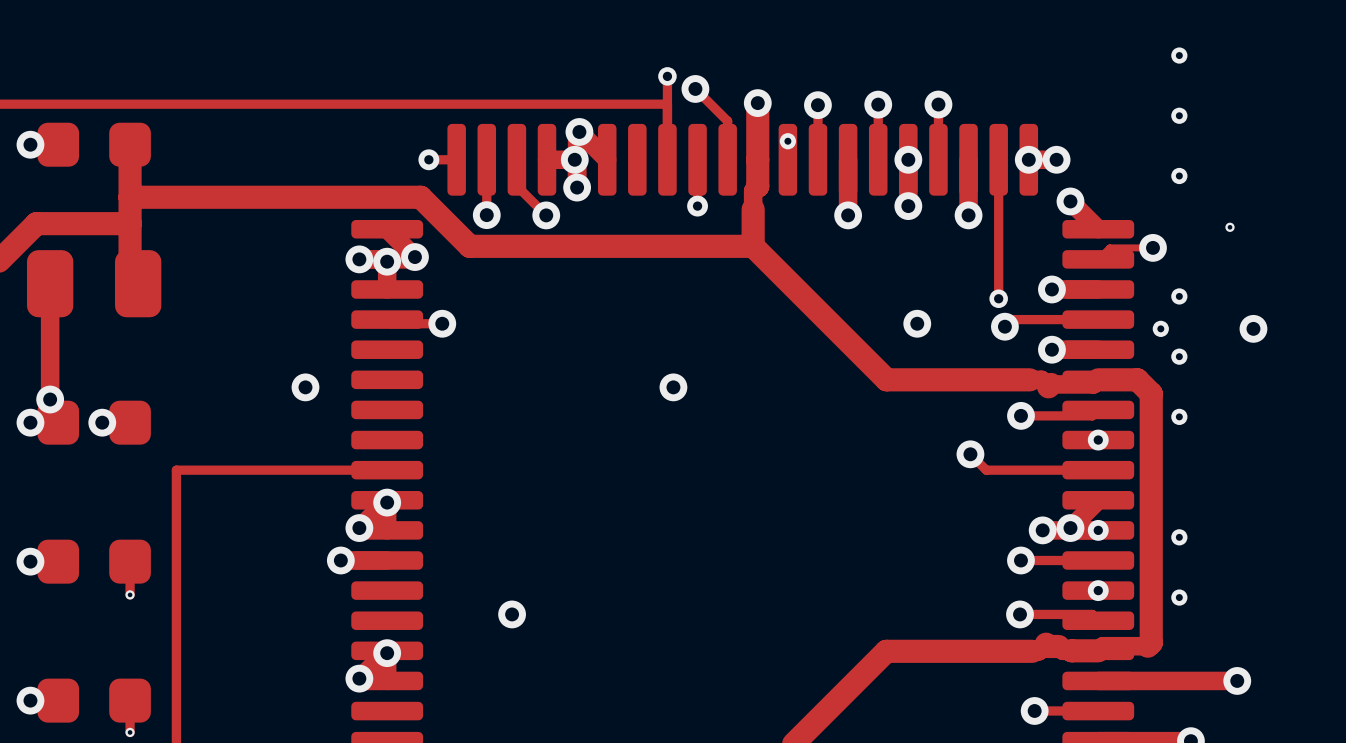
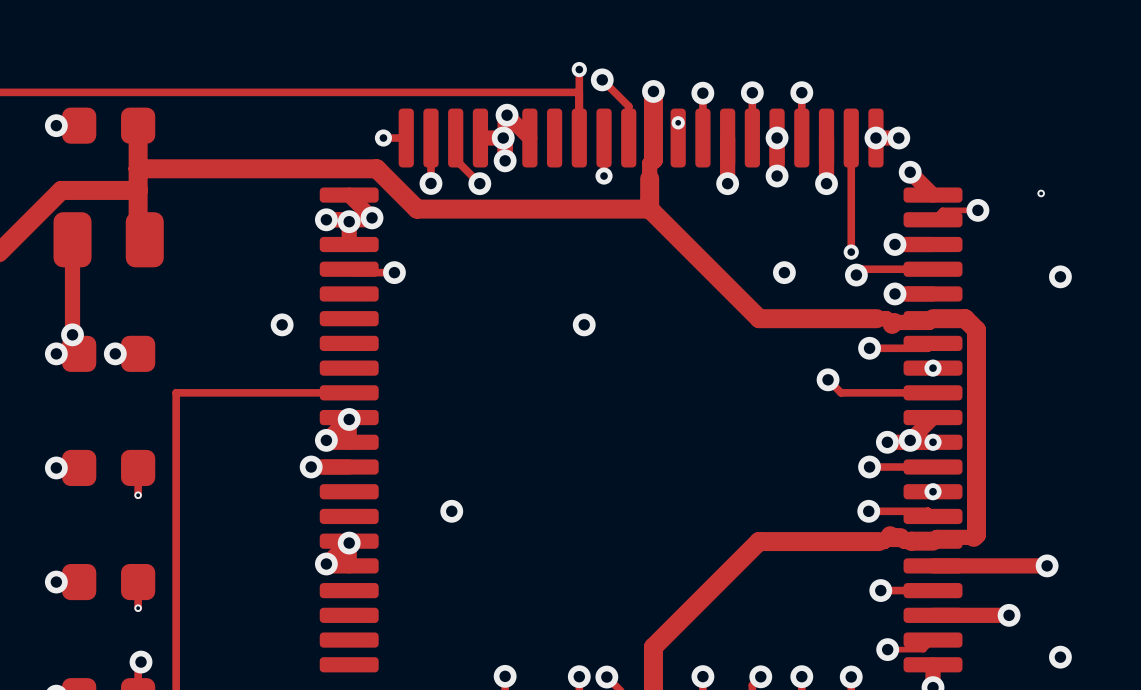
via: (1179, 55) -> none
via: (1179, 115) -> none
via: (1179, 175) -> none
via: (1179, 296) -> none
via: (1160, 328) -> none
via: (1179, 356) -> none
via: (1179, 416) -> none
via: (1179, 537) -> none
via: (1179, 597) -> none

